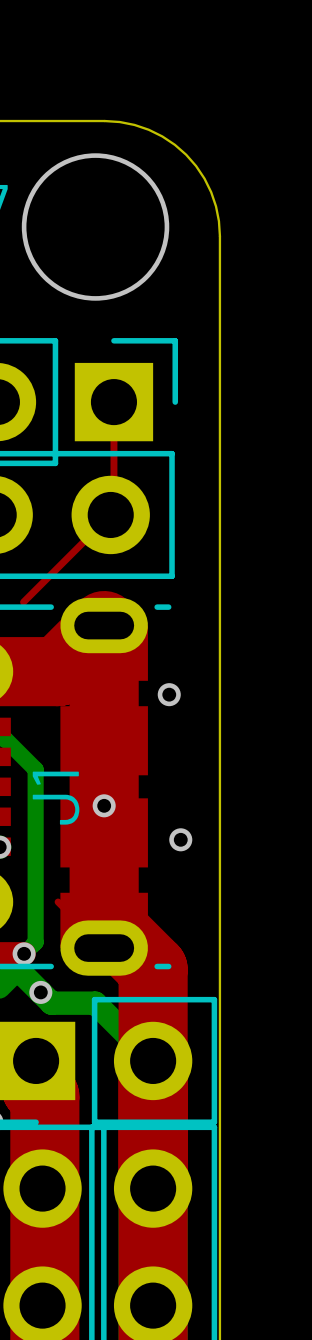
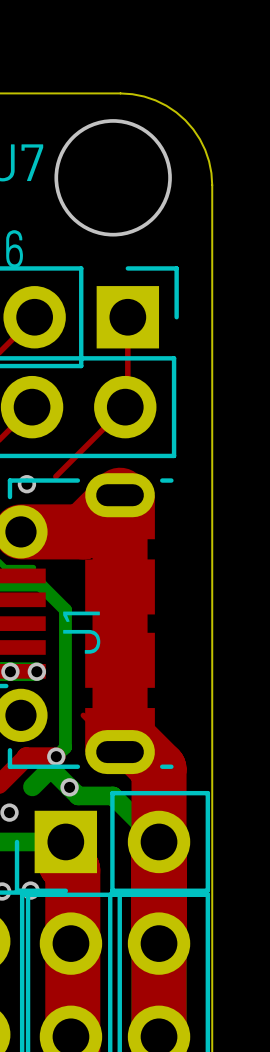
via: (169, 694) -> none
via: (104, 805) -> none
via: (180, 839) -> none

